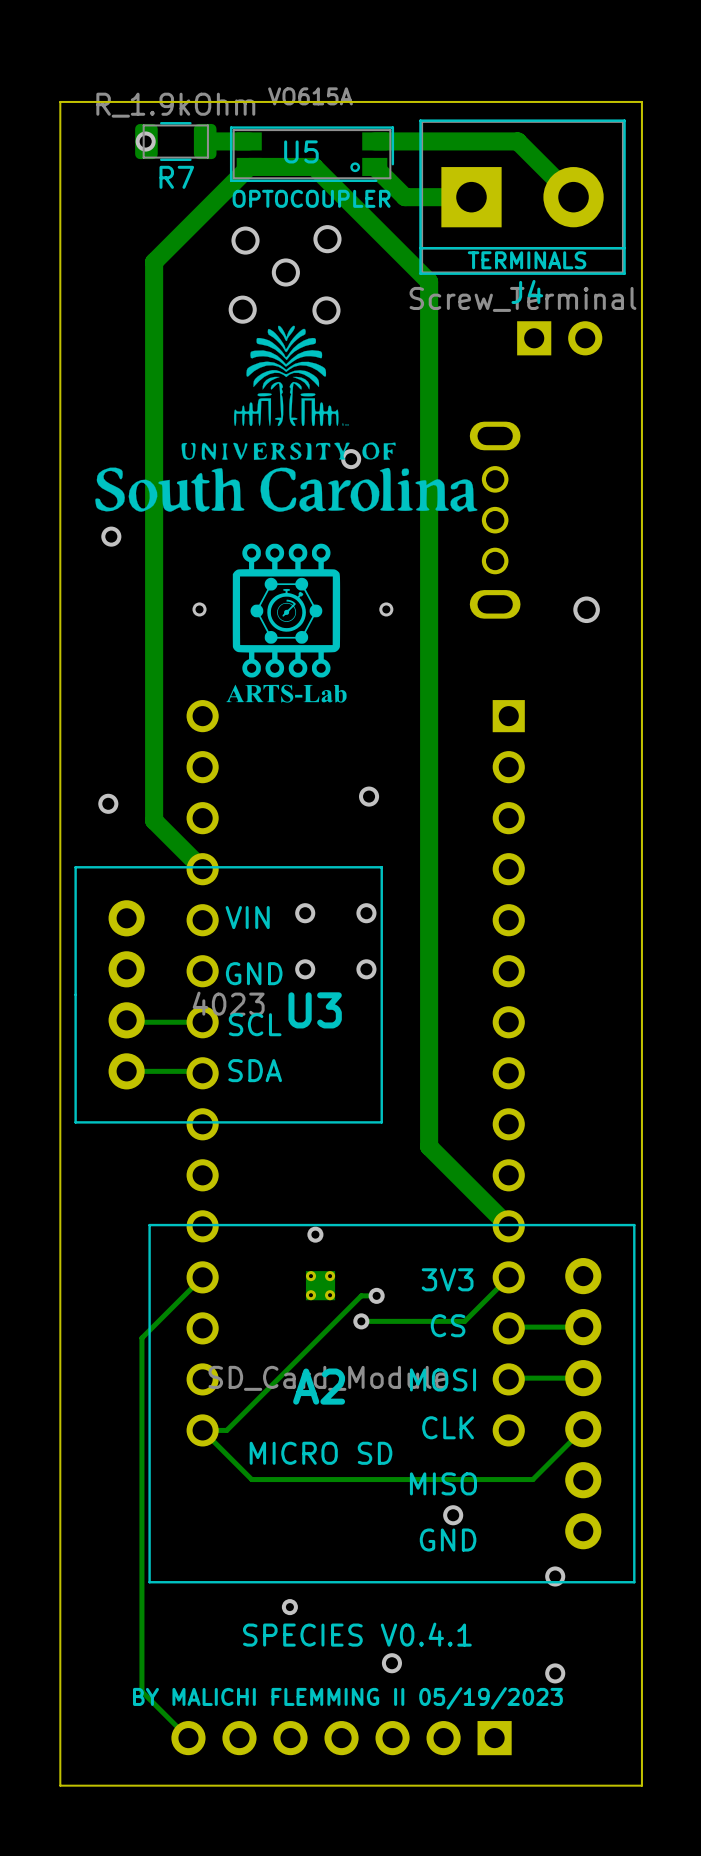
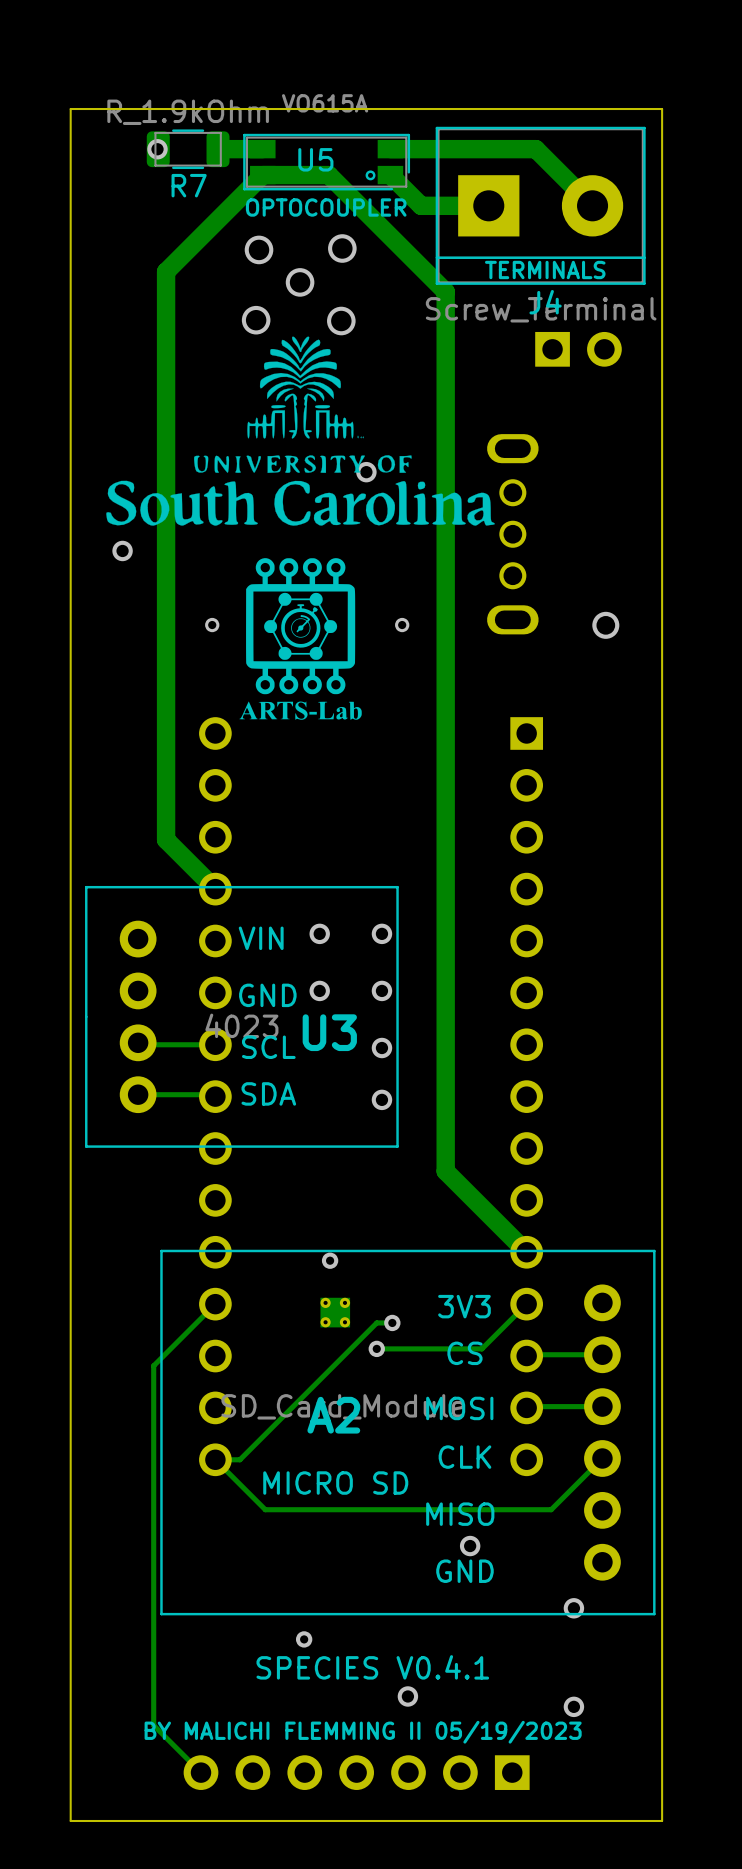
via: (369, 796) -> none
via: (108, 803) -> none
via: none -> (381, 1048)
via: none -> (381, 1099)

